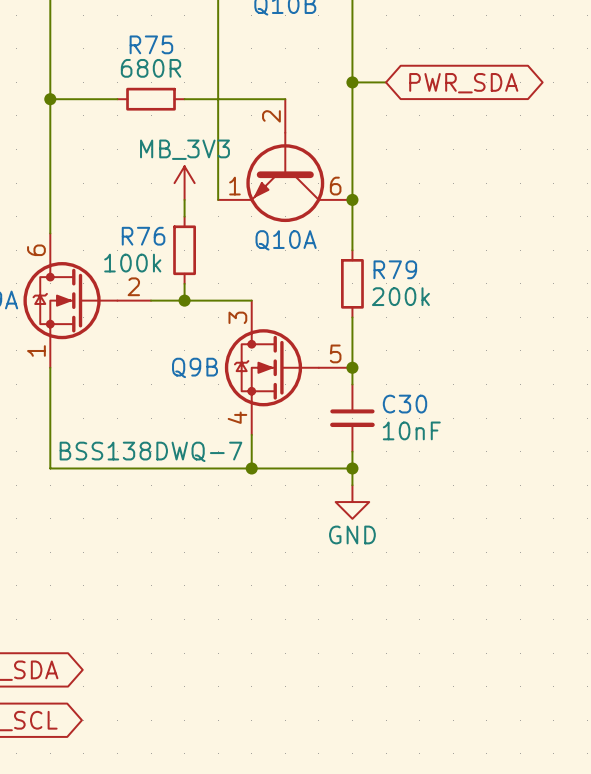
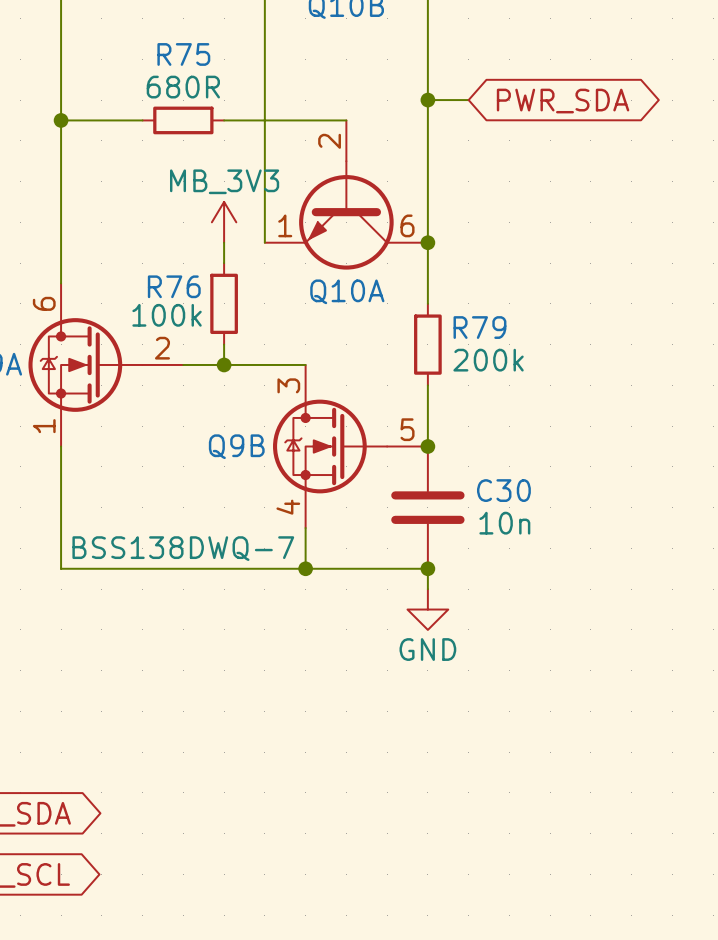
R75 value: 680R (151, 68) -> none
R75 text: none -> 680R (183, 87)
R76 text: none -> 100k (167, 315)
R76 value: 100k (132, 263) -> none
R79 value: 200k (400, 296) -> none
R79 text: none -> 200k (488, 360)
C30 symbol: [330, 384, 375, 452] -> [391, 446, 465, 569]
C30 value: 10nF (411, 430) -> none
C30 text: none -> 10n (504, 523)

